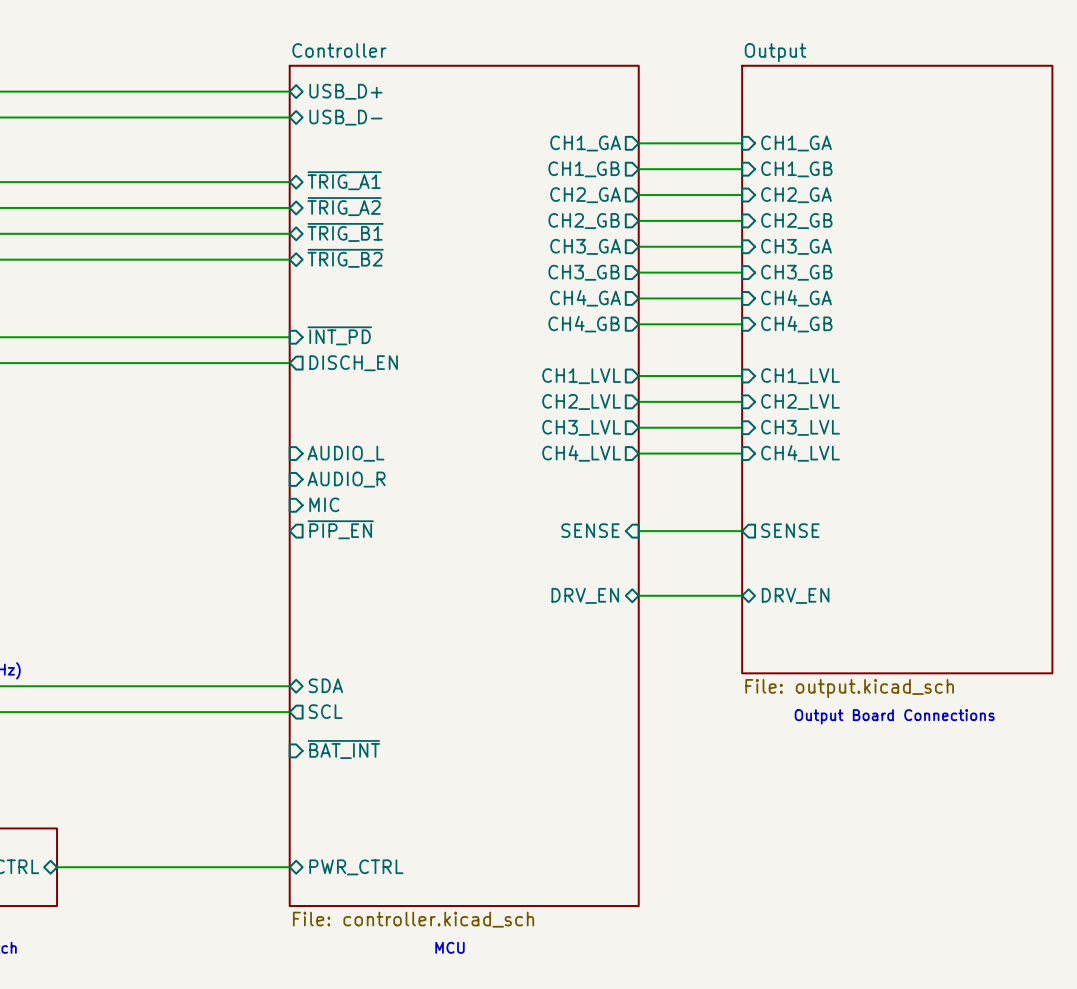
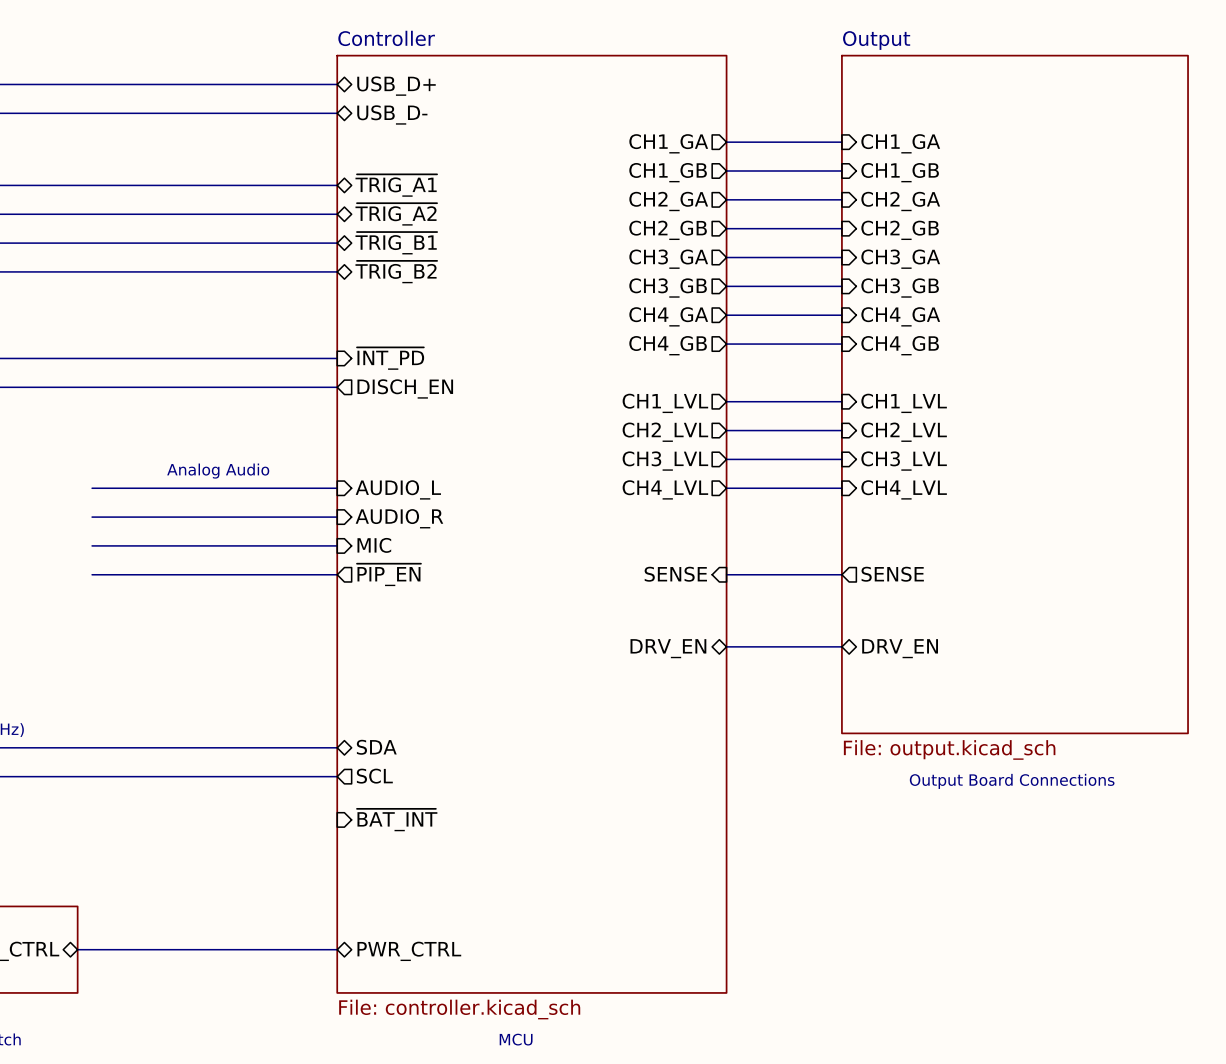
text: none -> Analog Audio (218, 471)
wire: none -> (92, 488) (337, 488)
wire: none -> (92, 517) (337, 517)
wire: none -> (92, 545) (337, 545)
wire: none -> (92, 574) (337, 574)

